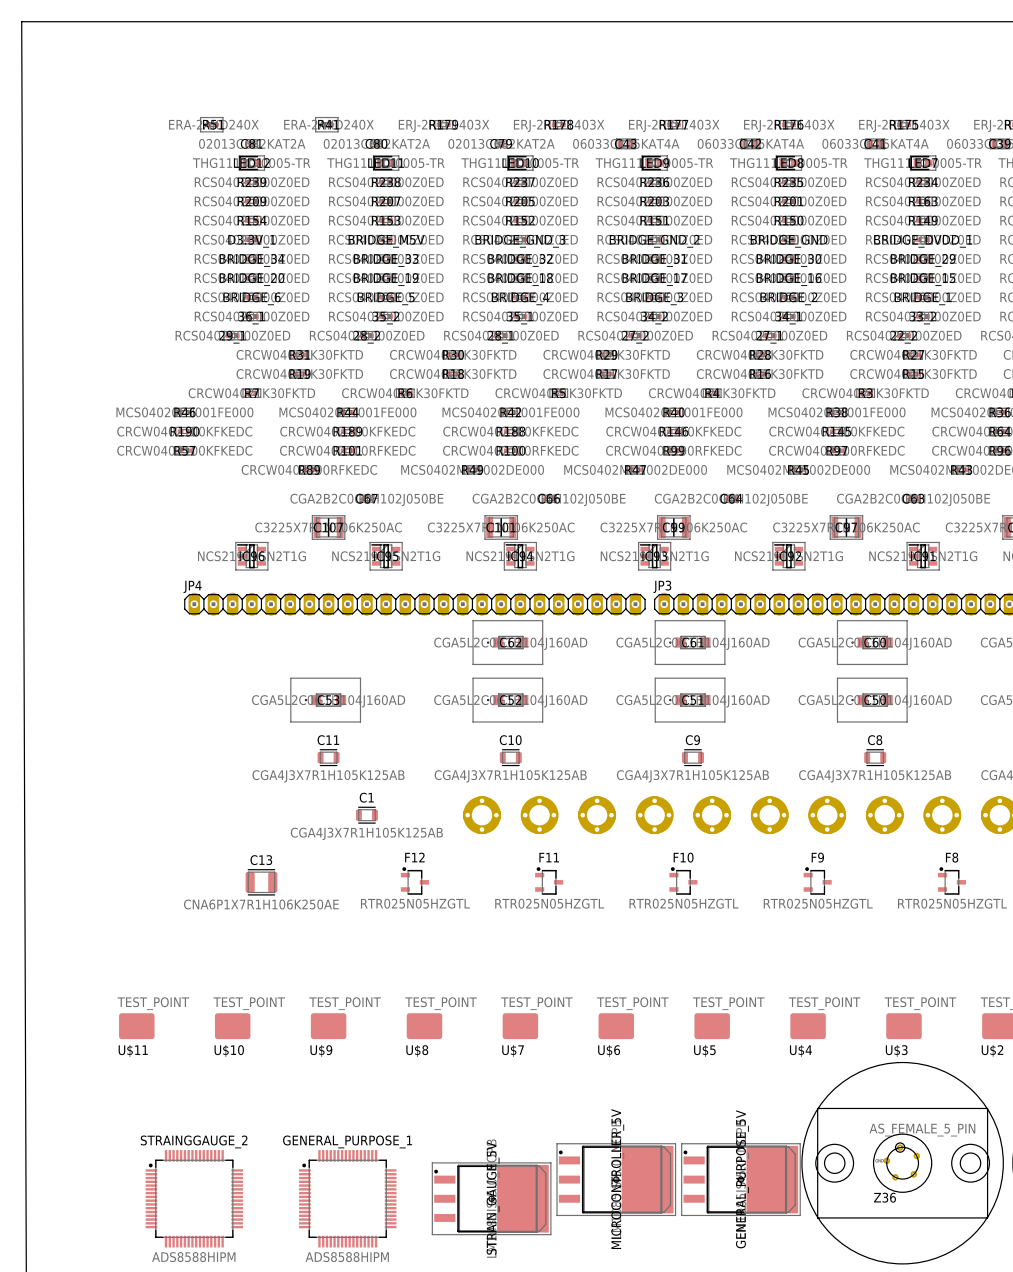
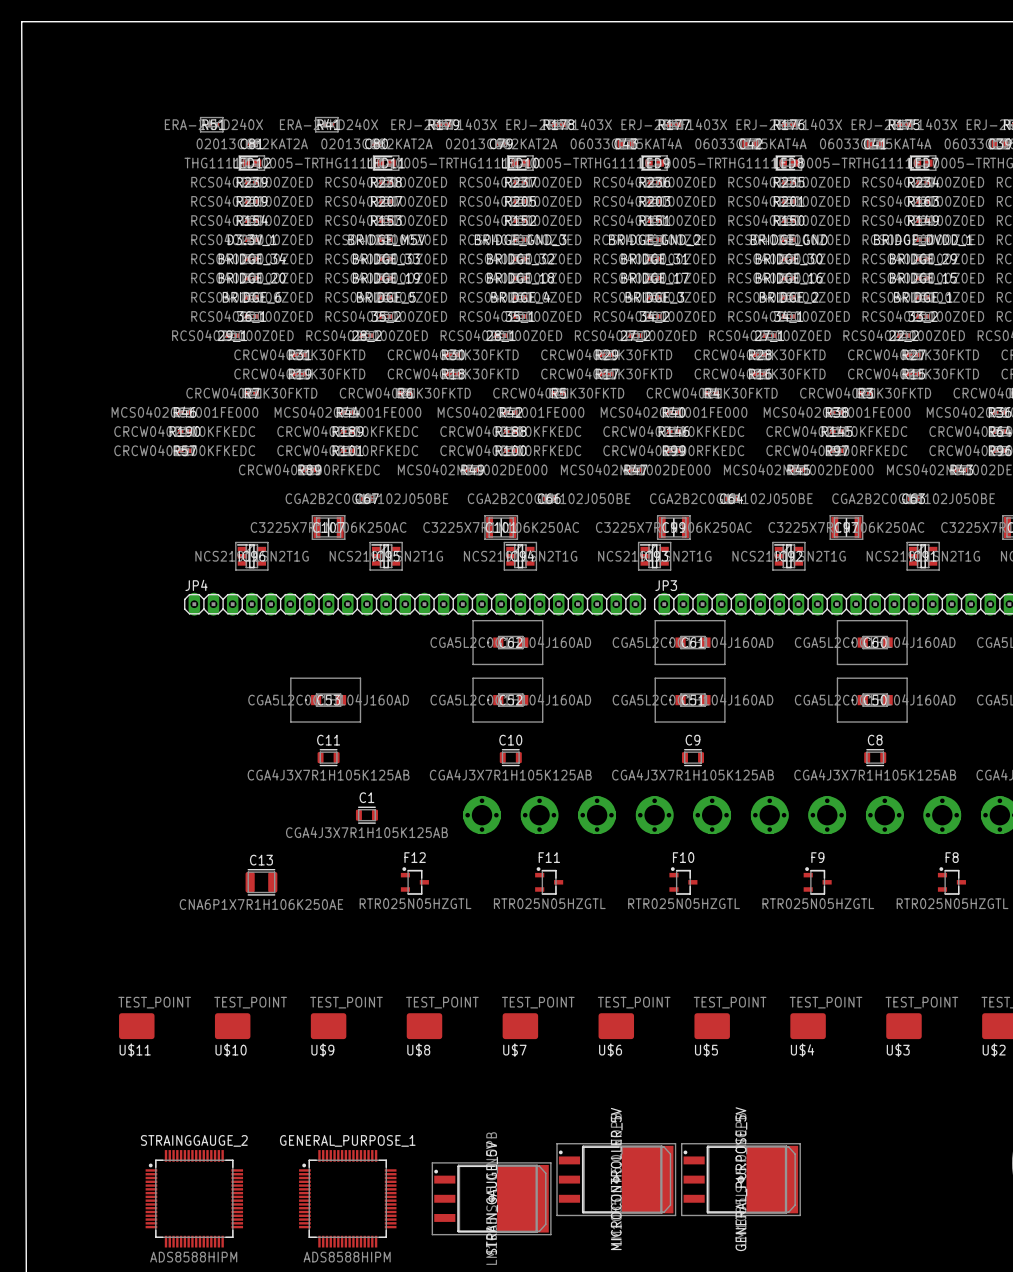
Z36: AS_FEMALE_5_PIN (902, 1163) -> none

